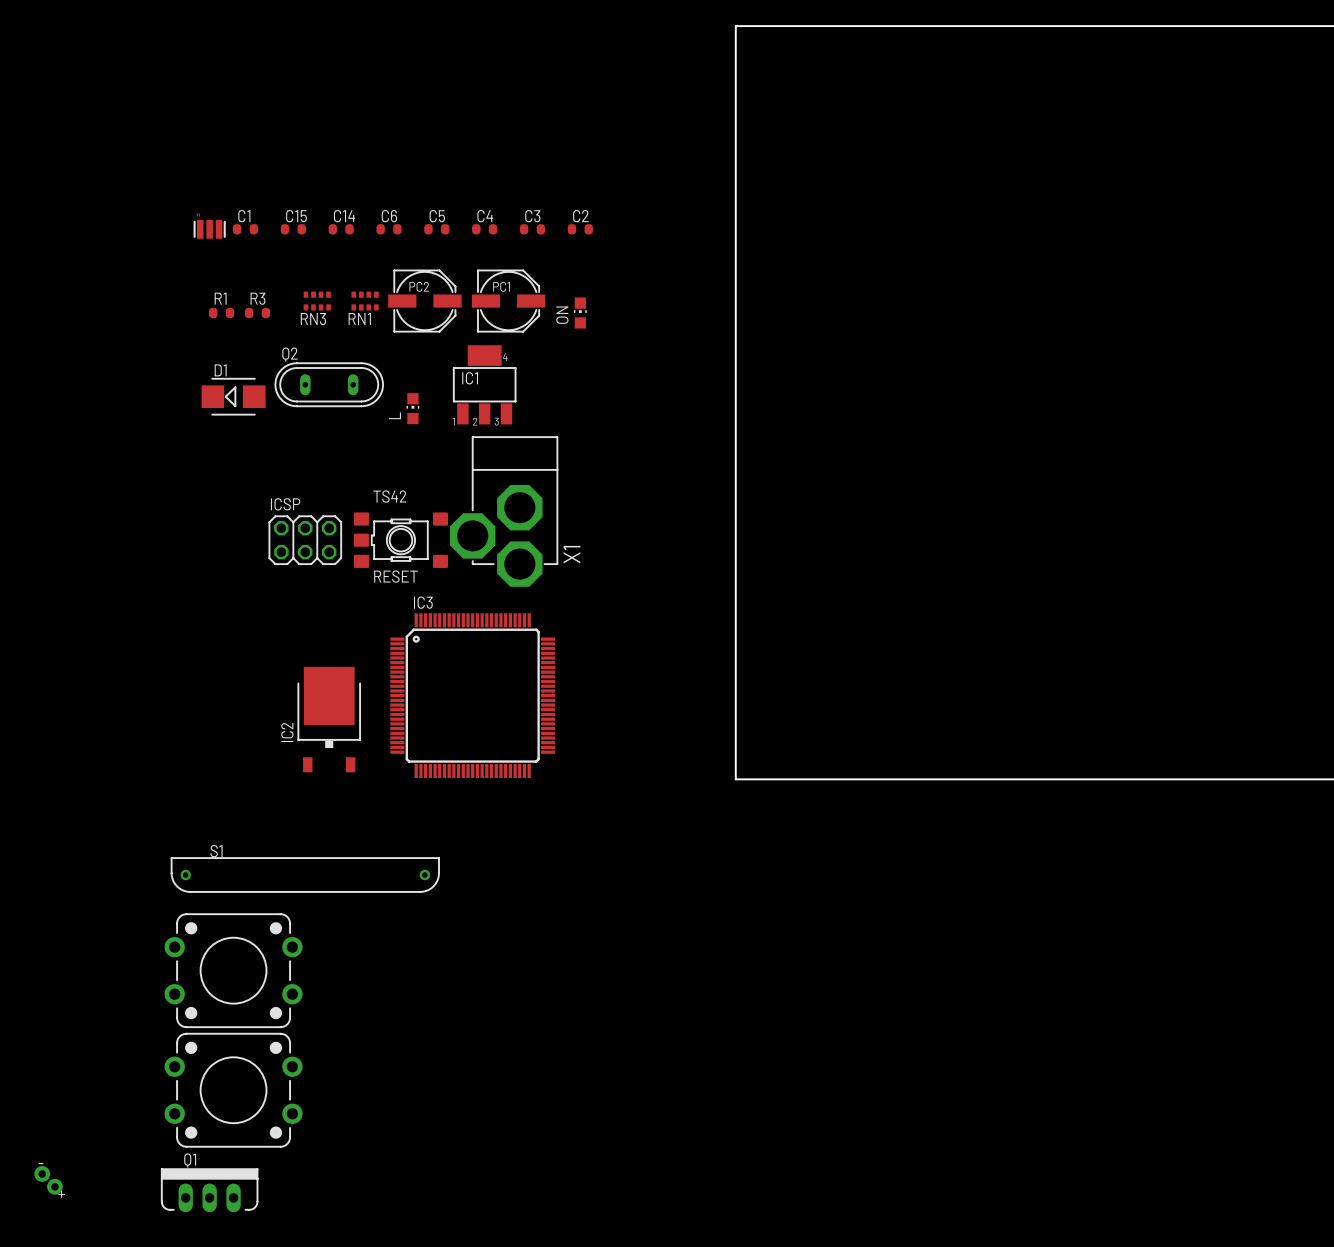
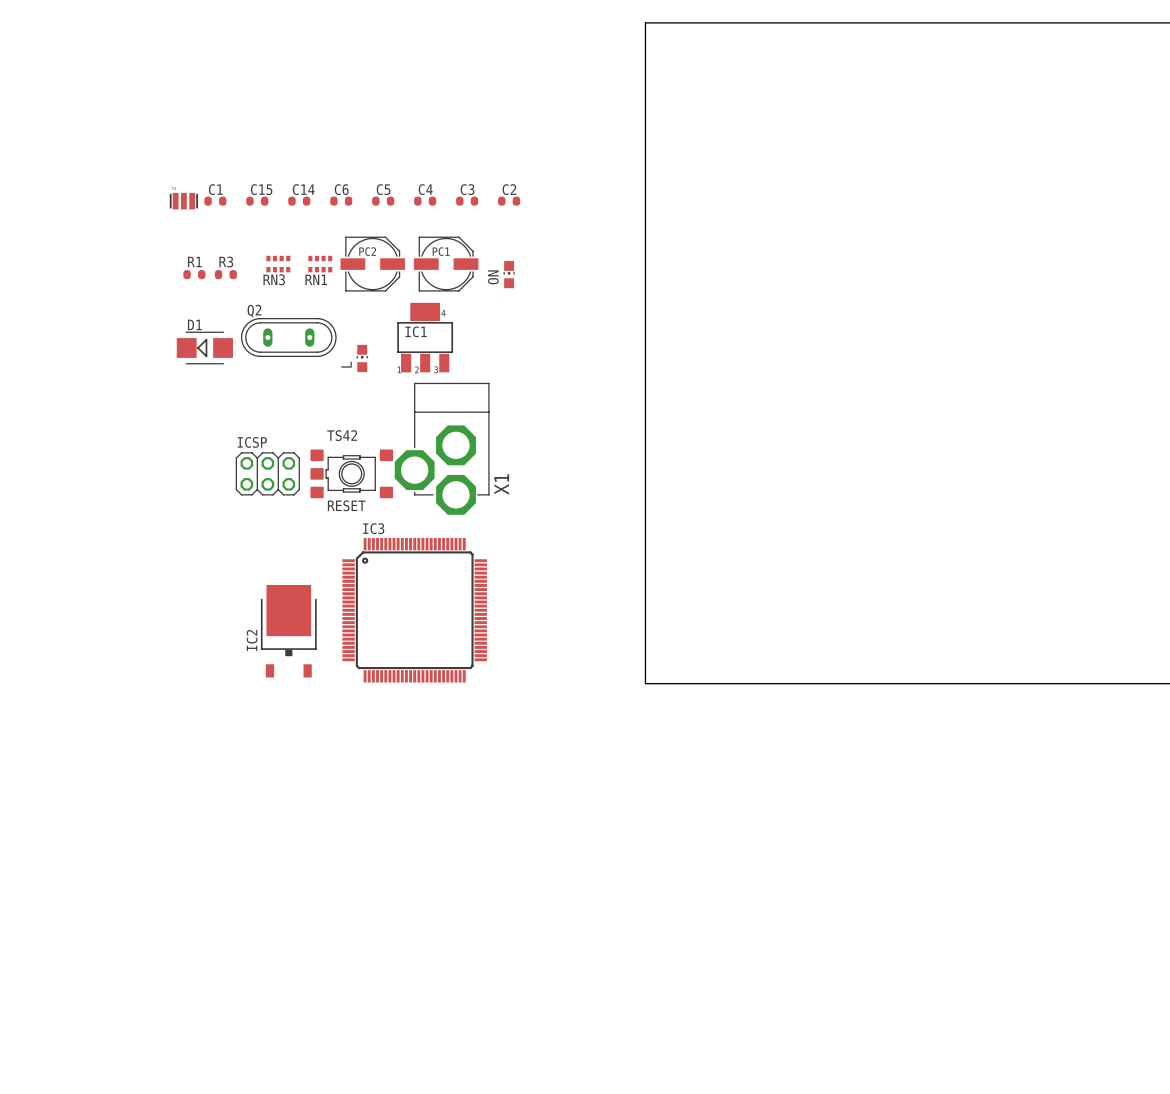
S1: (305, 875) -> none
part: (233, 970) -> none
part: (233, 1090) -> none
part: (48, 1180) -> none
Q1: (209, 1190) -> none

